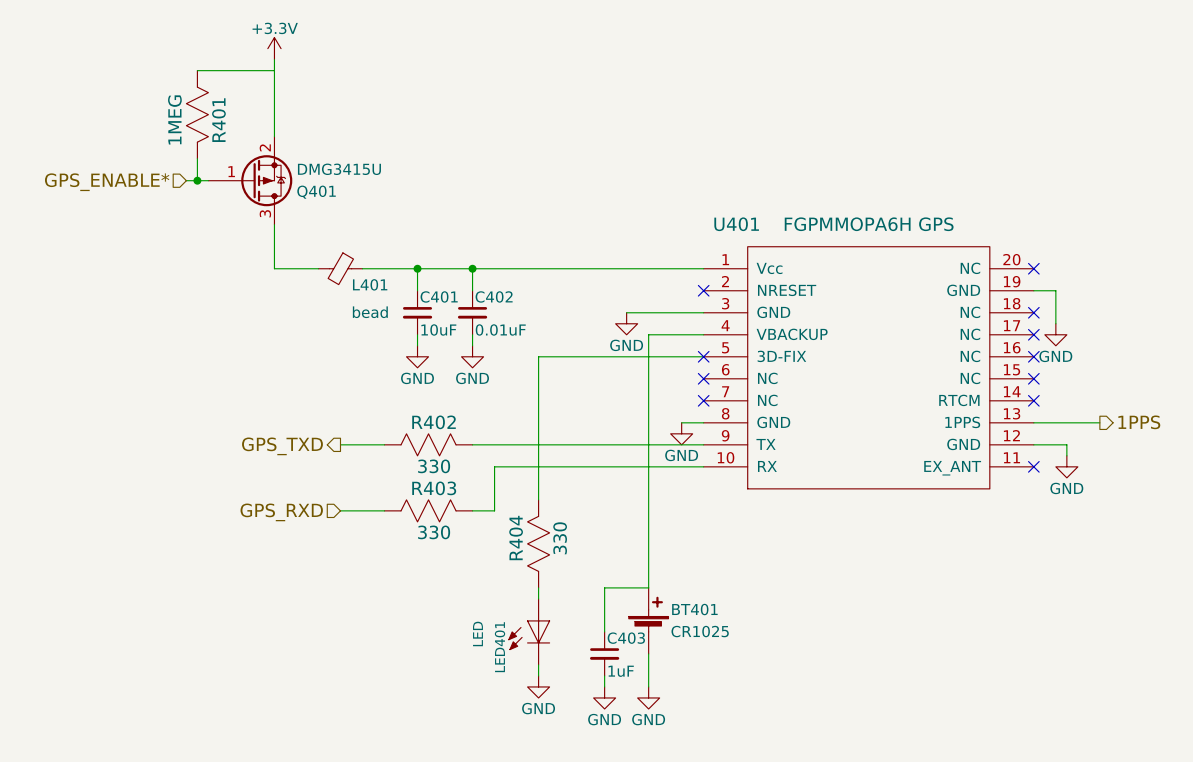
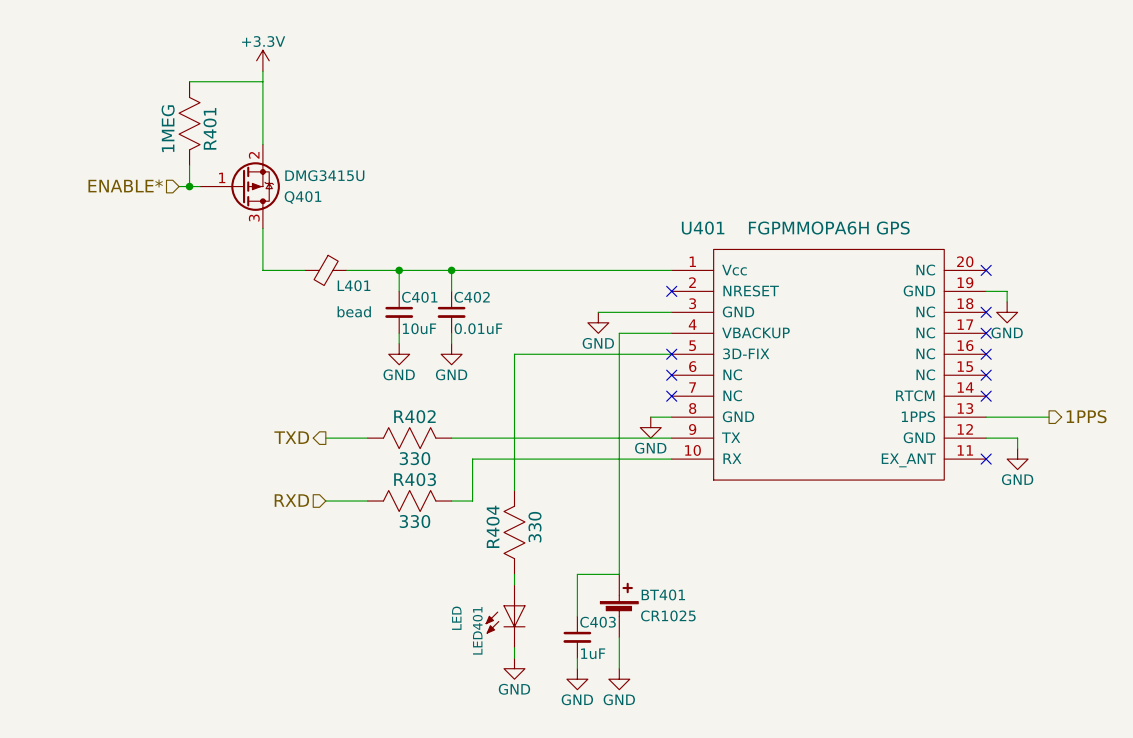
hierarchical label: GPS_ENABLE* (107, 182) -> ENABLE* (125, 185)
power symbol position: GND (1055, 334) -> GND (1007, 312)
hierarchical label: GPS_TXD (282, 446) -> TXD (291, 437)
hierarchical label: GPS_RXD (281, 512) -> RXD (291, 500)

